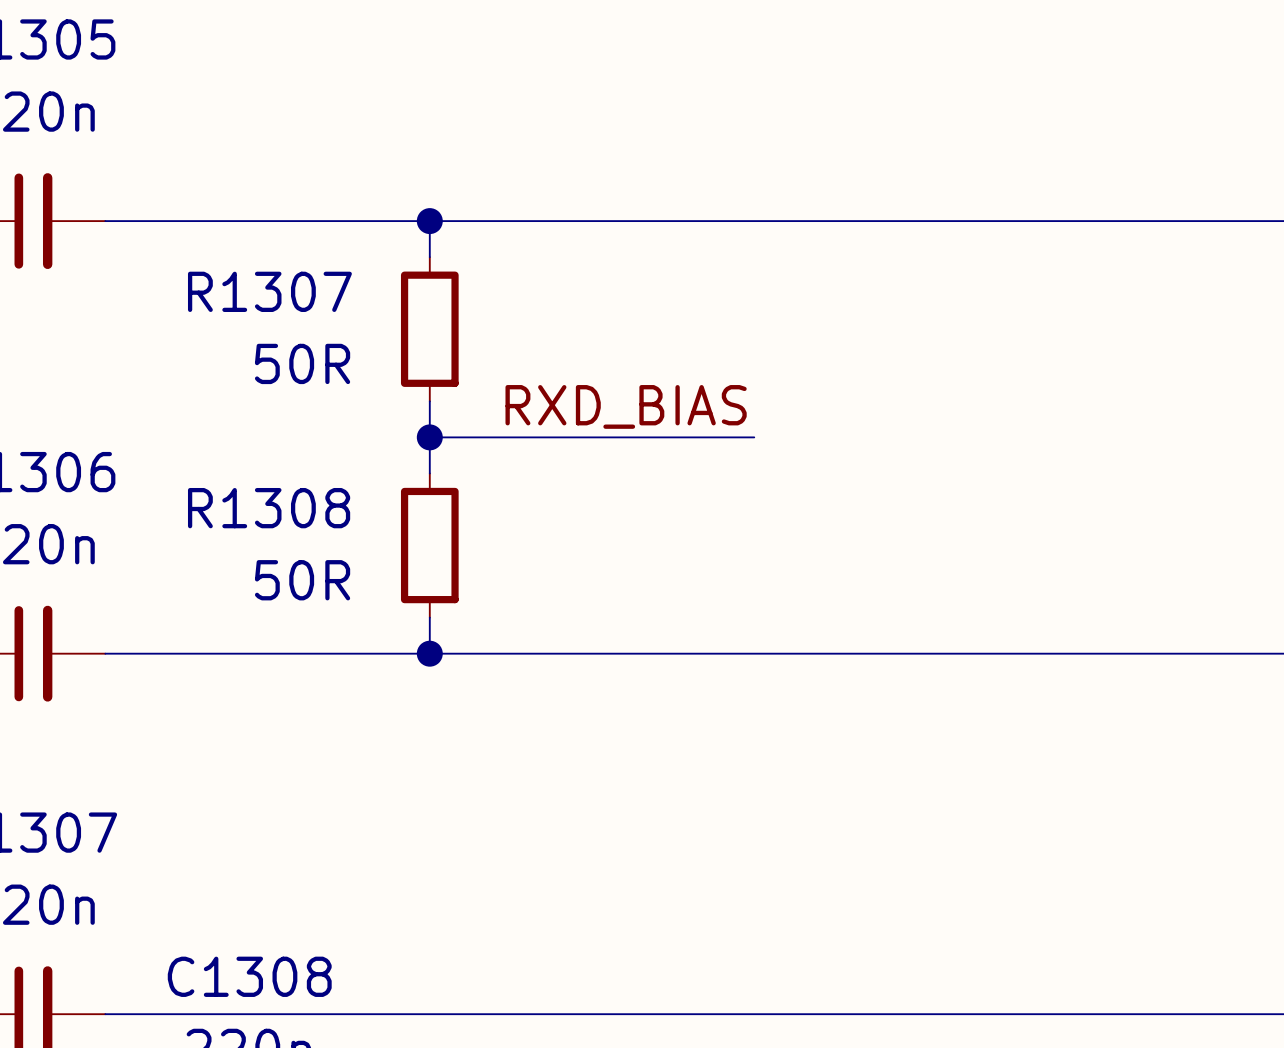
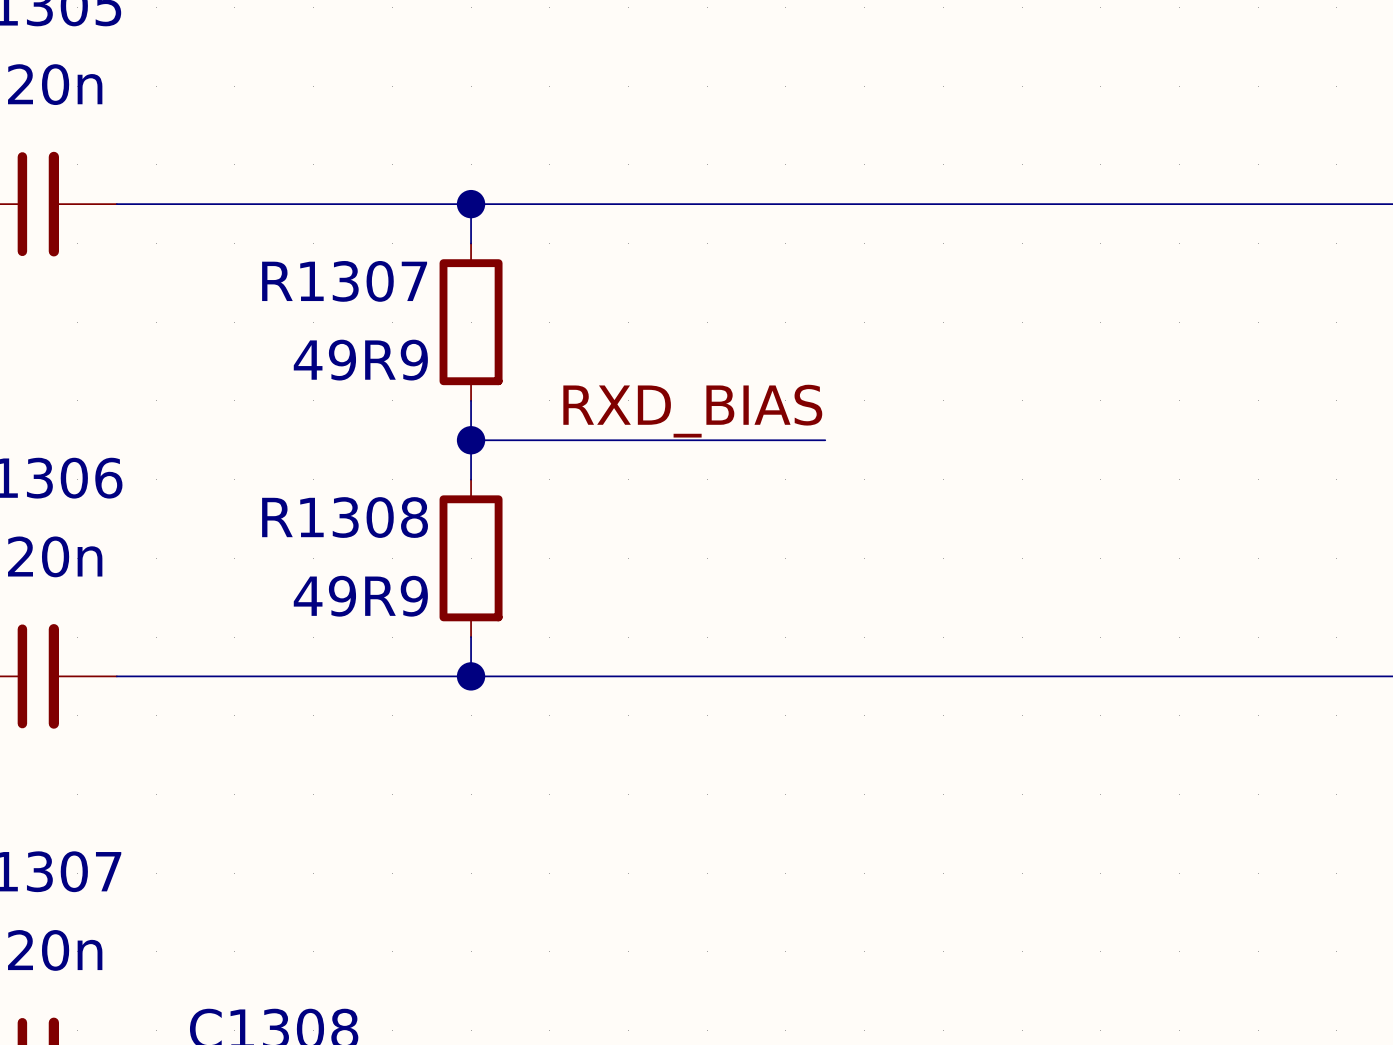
R1307 name position: R1307 (269, 291) -> R1307 (344, 281)
R1307 text: 50R (302, 363) -> 49R9 (360, 360)
R1308 name position: R1308 (269, 508) -> R1308 (345, 517)
R1308 text: 50R (302, 580) -> 49R9 (360, 596)

